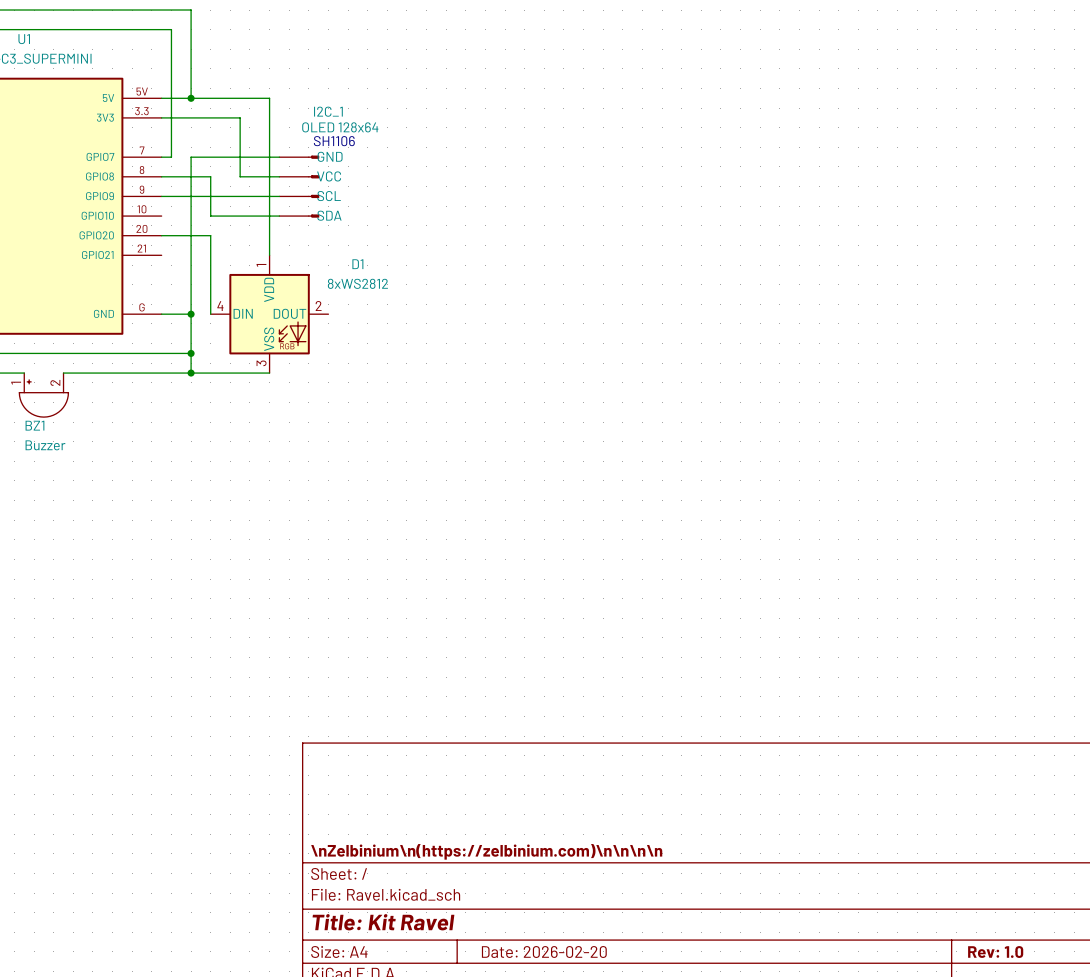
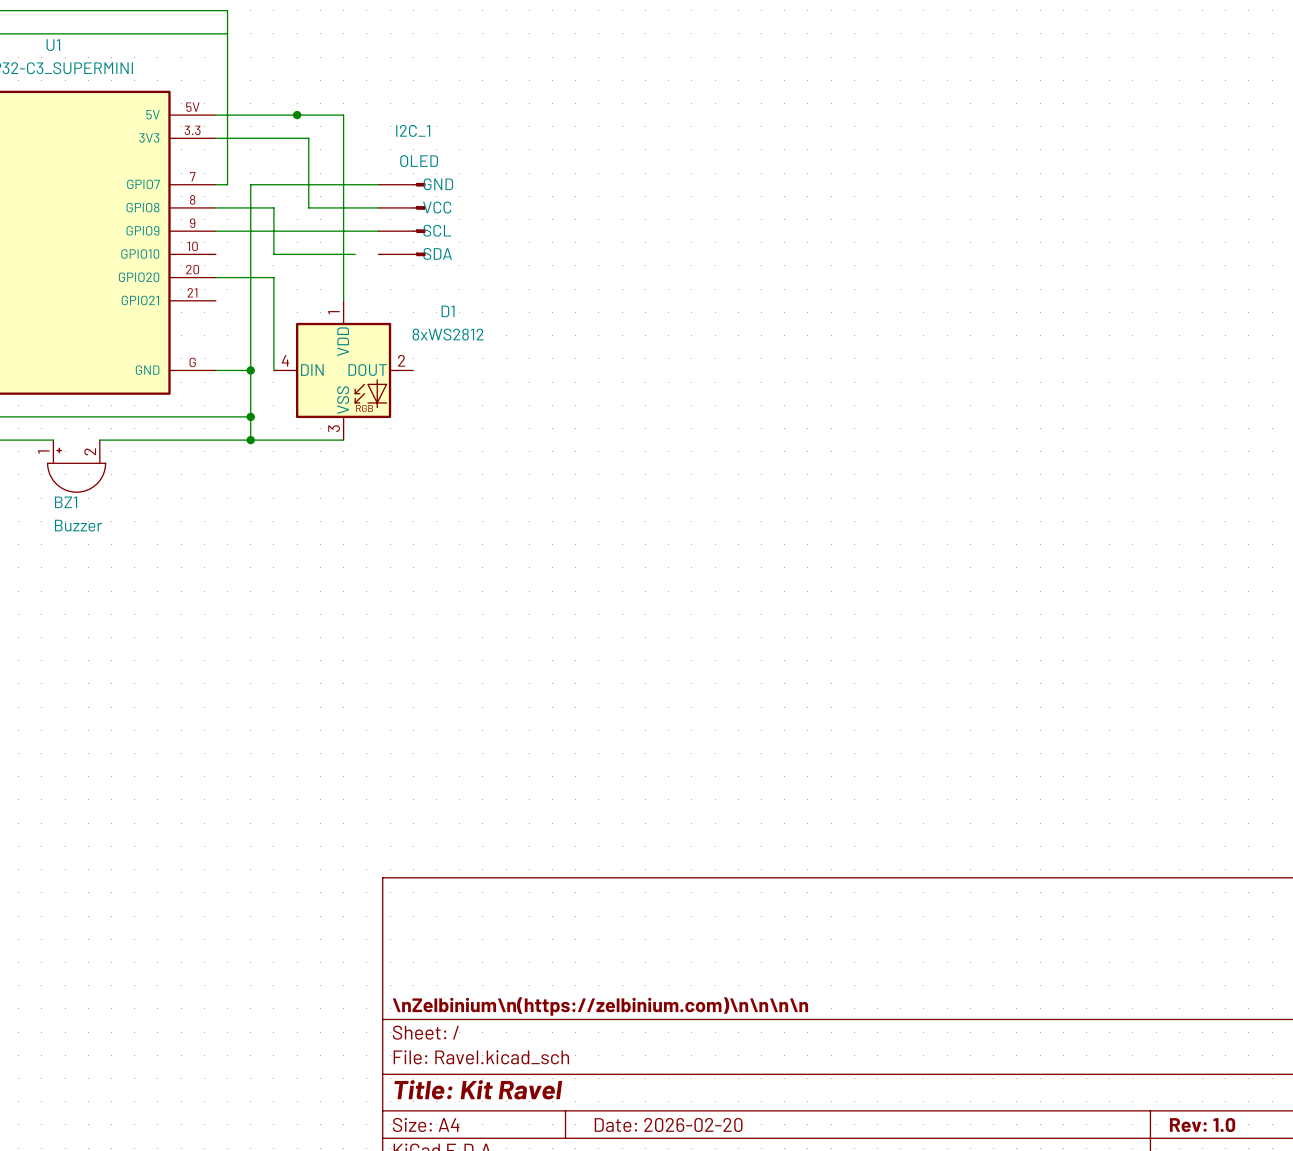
wire: (171, 10) (191, 10) (191, 98) -> (227, 10) (227, 33)
junction position: (191, 98) -> (297, 115)
I2C_1 value: OLED 128x64 (340, 127) -> OLED (419, 161)
text: SH1106 (334, 141) -> none
I2C_1 position: (299, 186) -> (401, 219)

